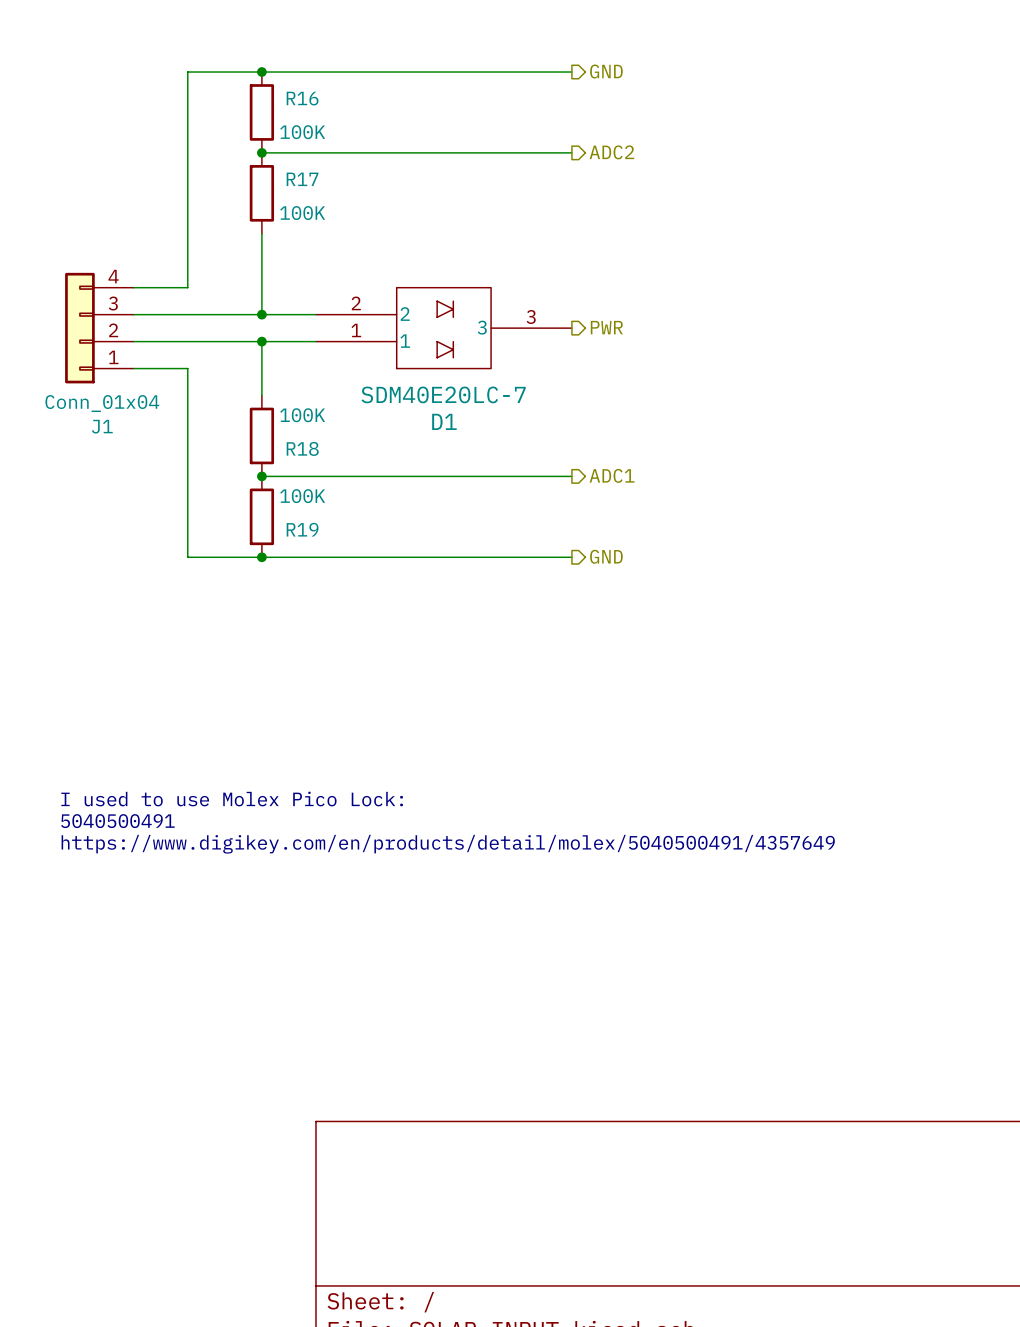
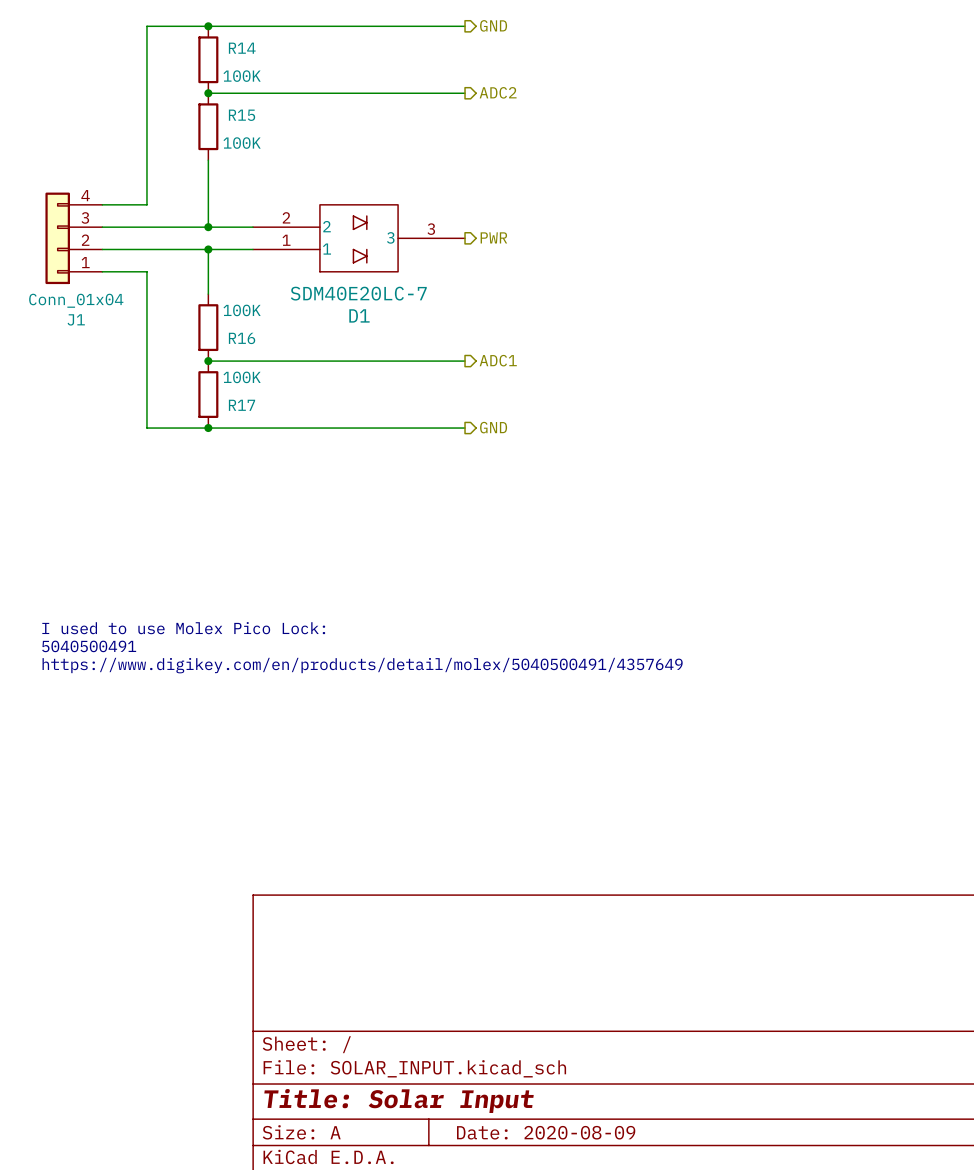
R16 name: R16 (302, 98) -> R14 (242, 48)
R17 name: R17 (302, 179) -> R15 (242, 115)
R18 name: R18 (302, 448) -> R16 (242, 338)
R19 name: R19 (302, 529) -> R17 (242, 405)

